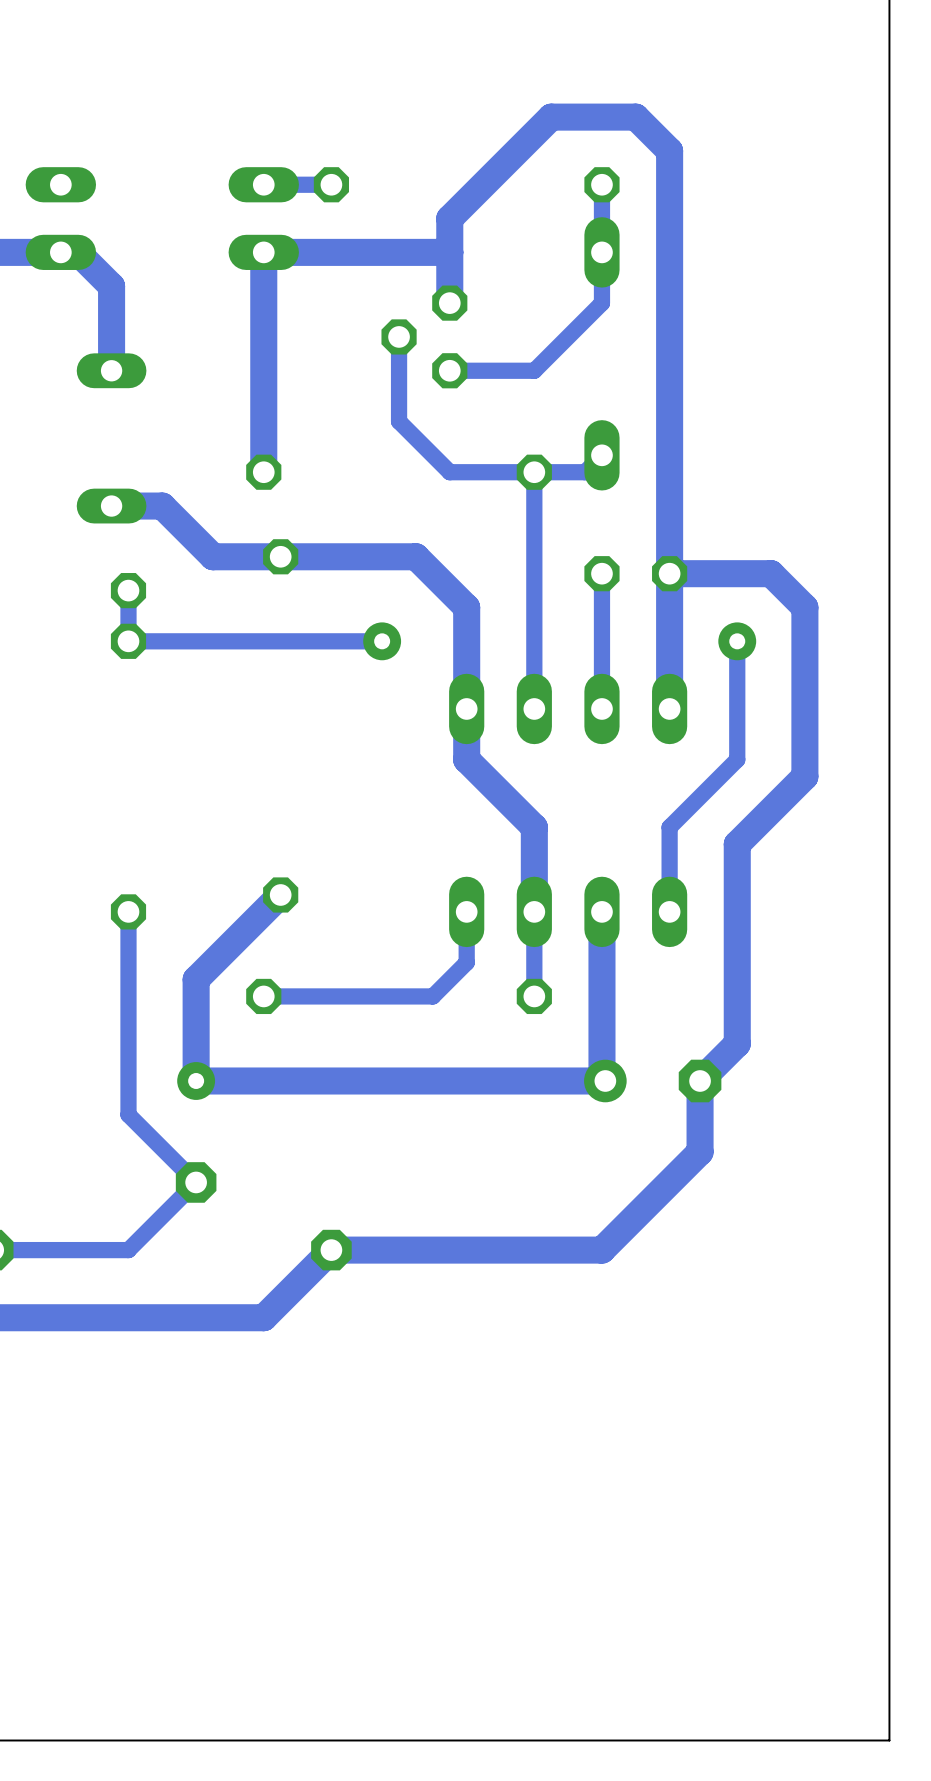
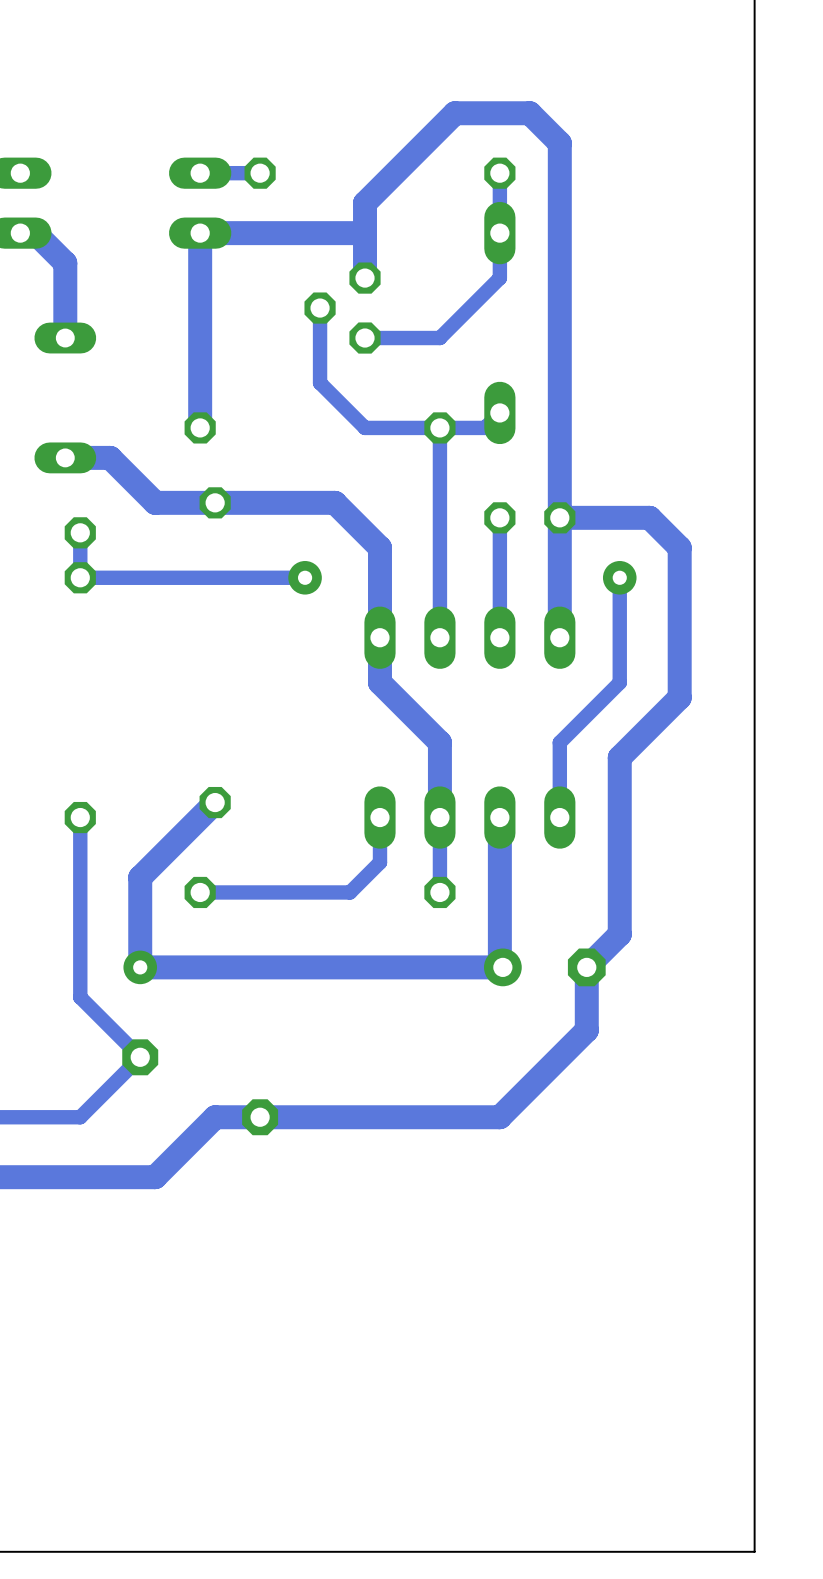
track: (331, 1250) (263, 1317) (213, 1317) -> (260, 1117) (215, 1117) (155, 1177)

